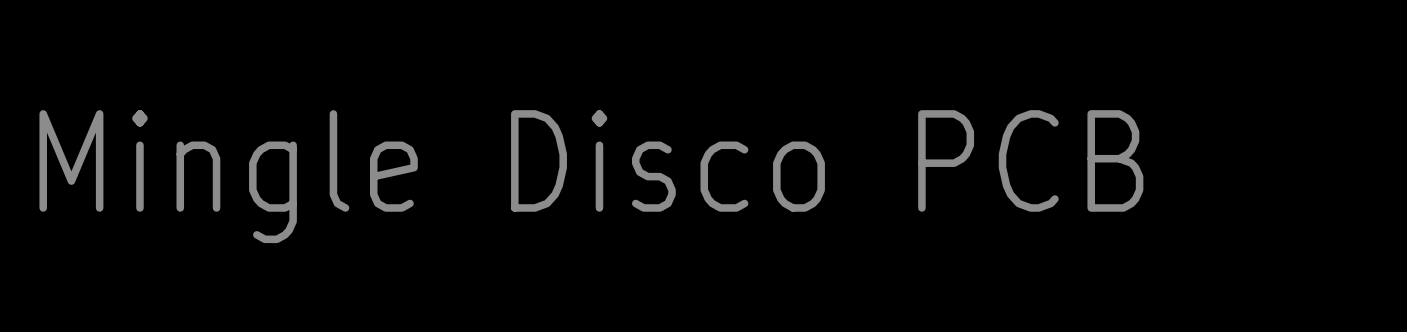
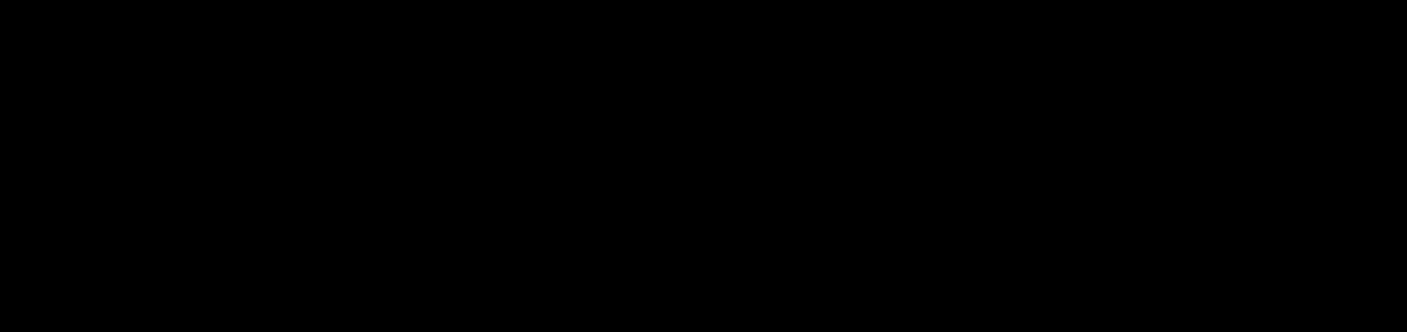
text: Mingle Disco PCB (591, 176) -> none

